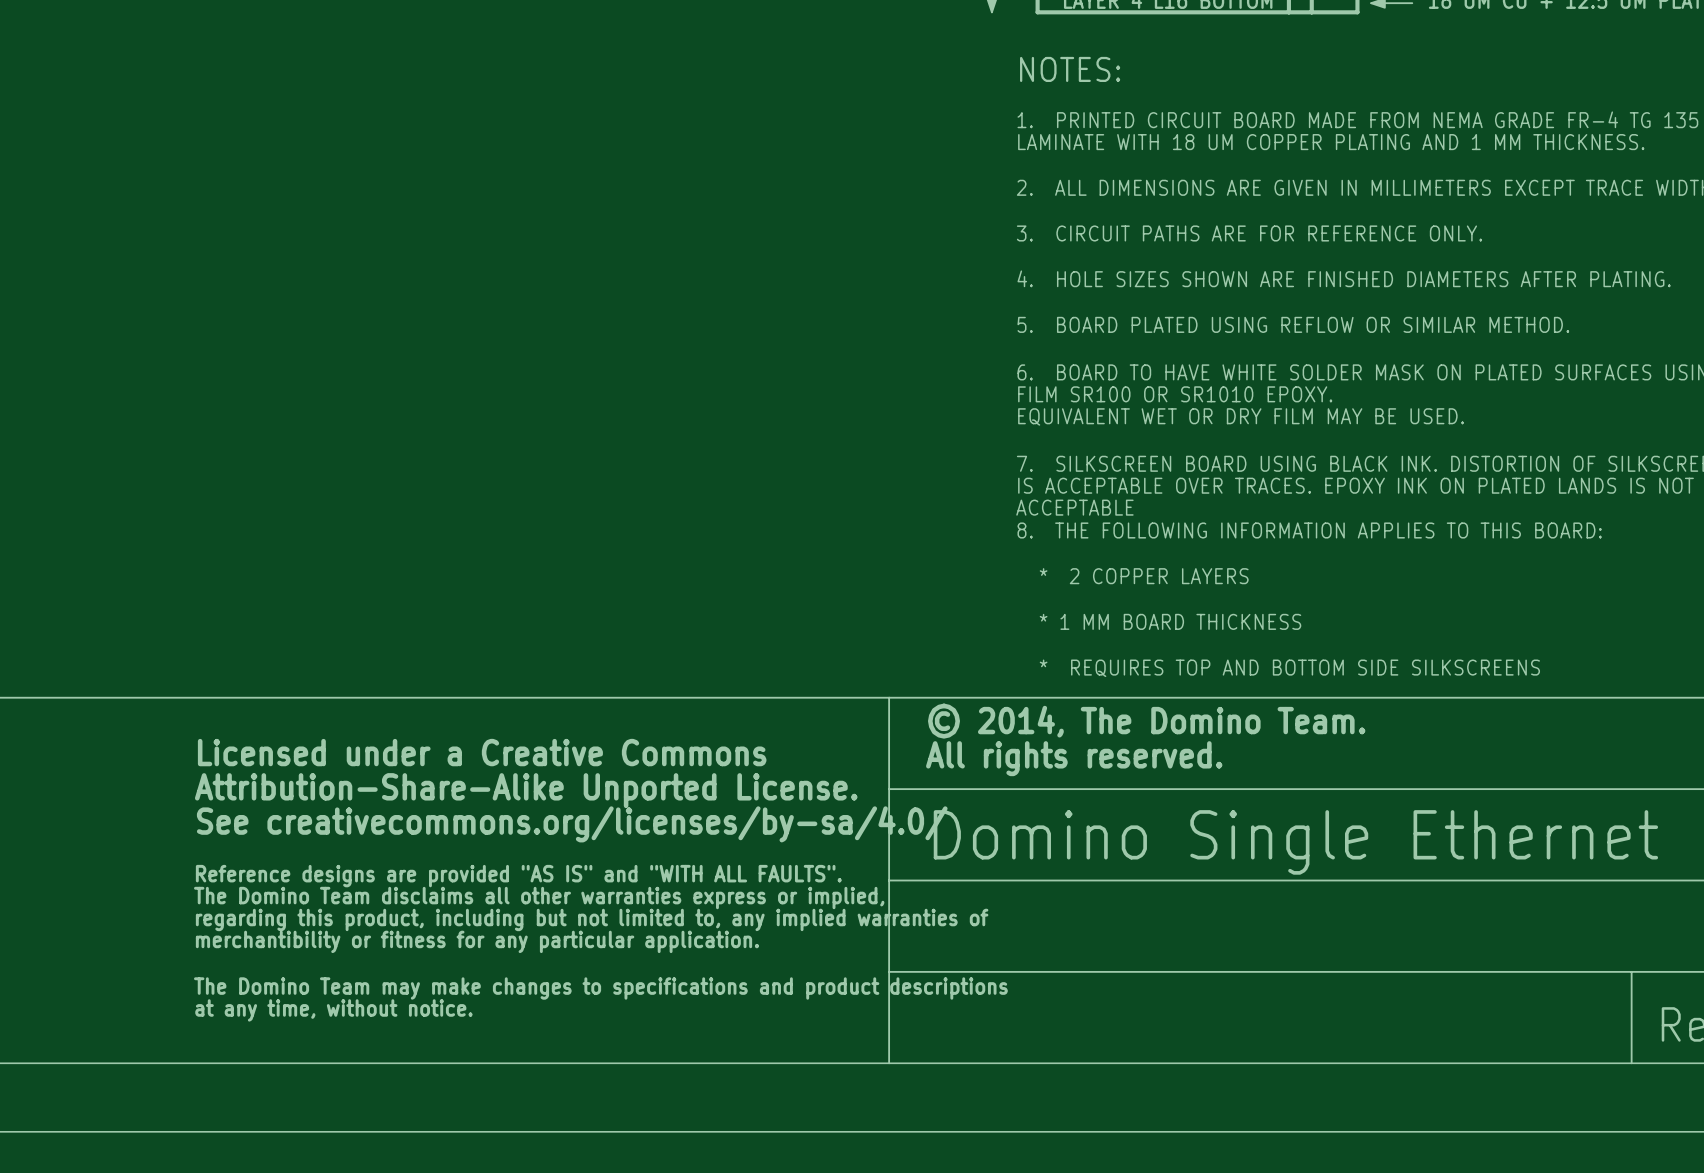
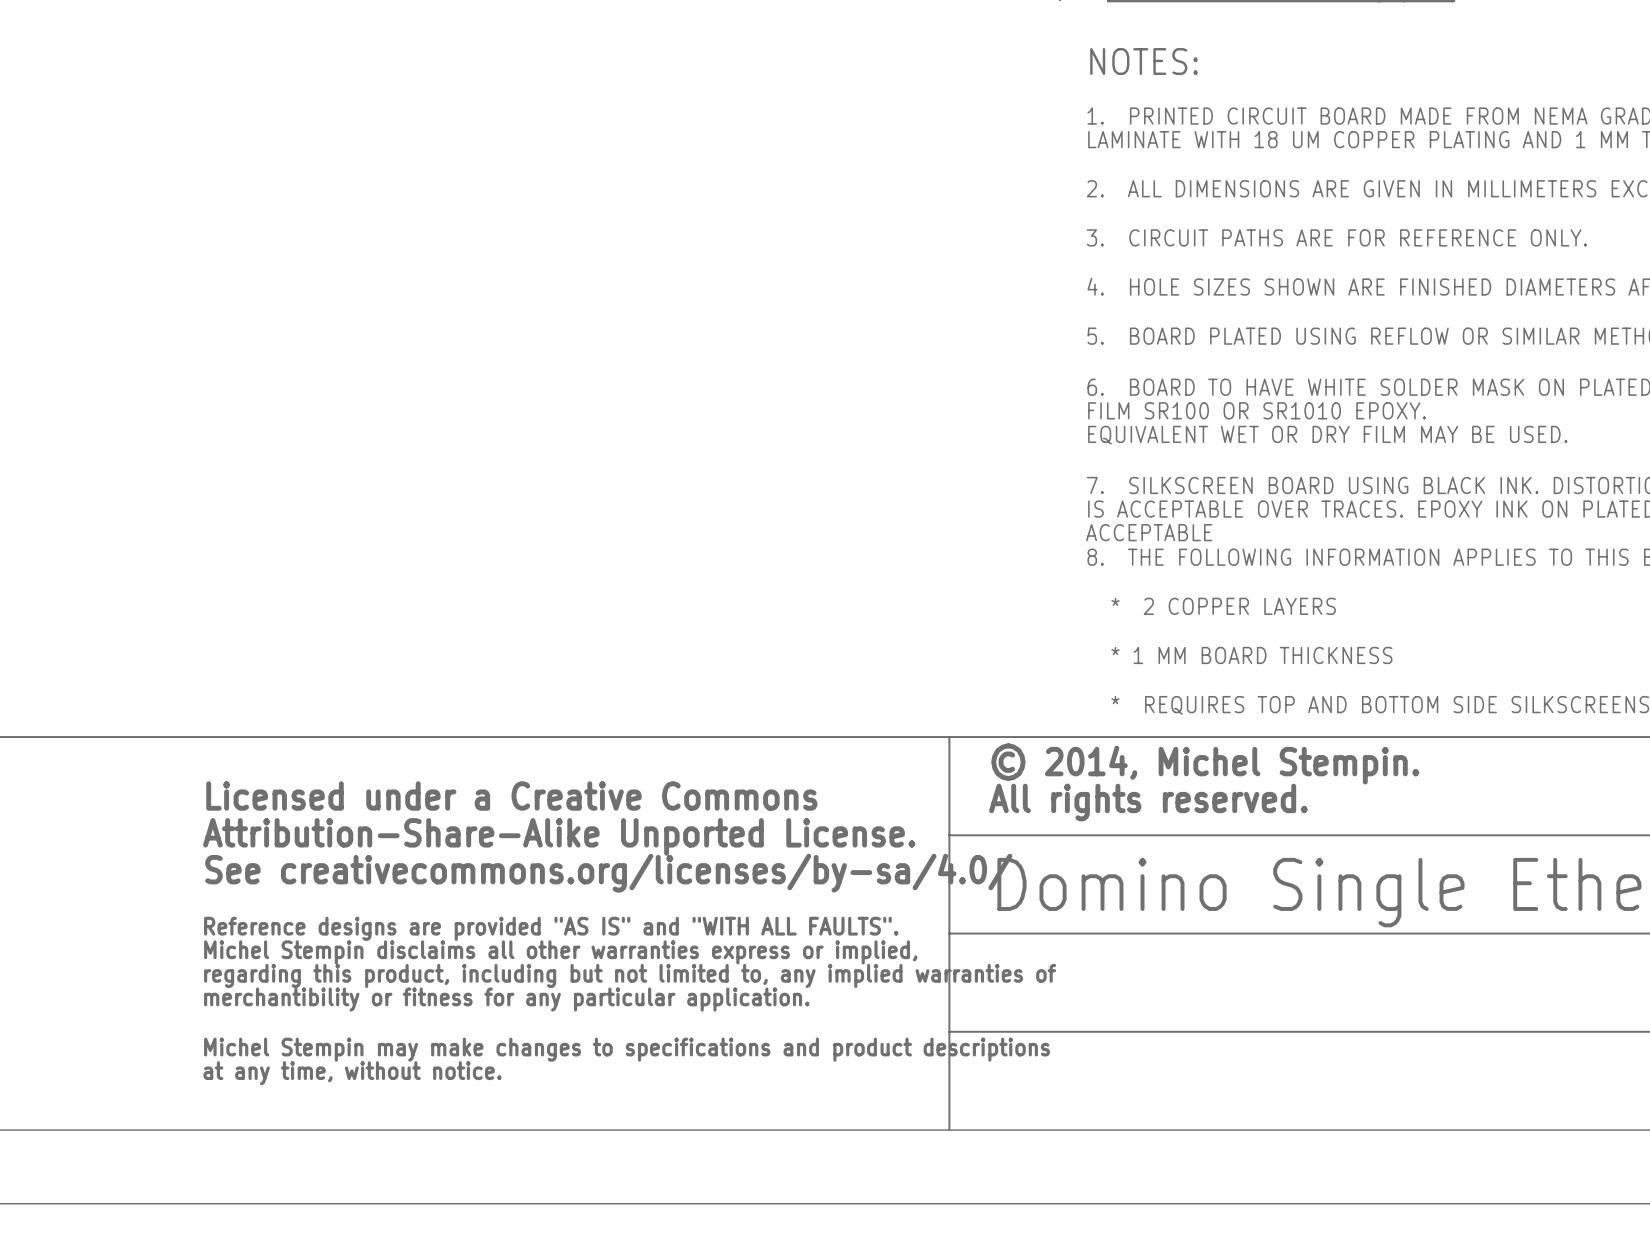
text: © 2014, The Domino Team. (1146, 721) -> © 2014, Michel Stempin. (1205, 763)
text: The Domino Team disclaims all other warranties express or implied, (539, 898) -> Michel Stempin disclaims all other warranties express or implied, (560, 952)
text: The Domino Team may make changes to specifications and product descriptions (600, 988) -> Michel Stempin may make changes to specifications and product descriptions (627, 1049)

